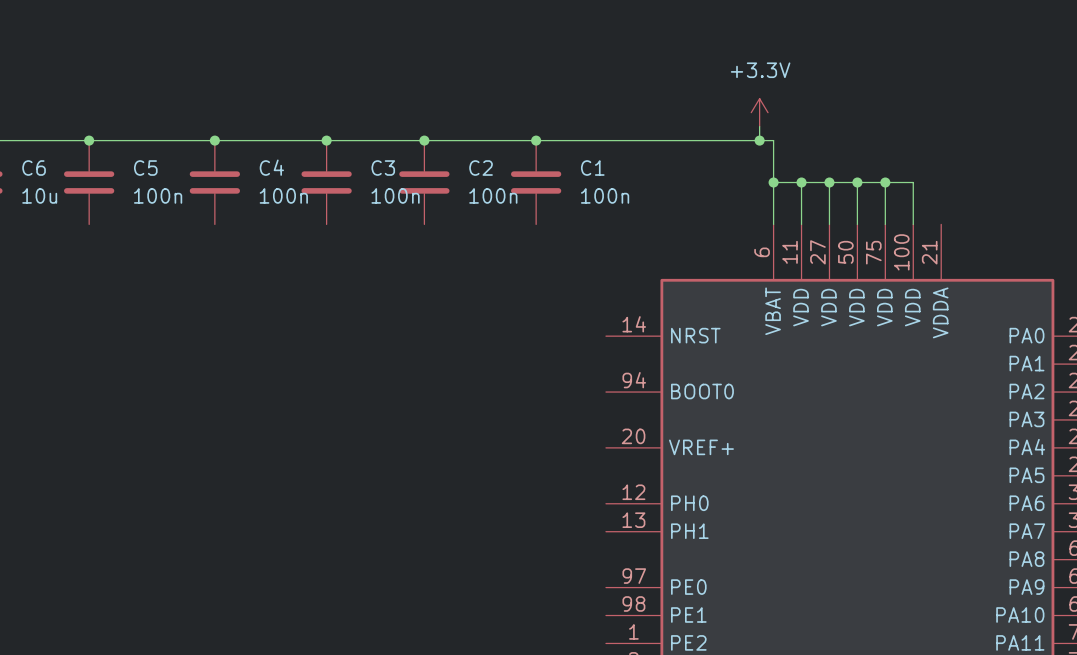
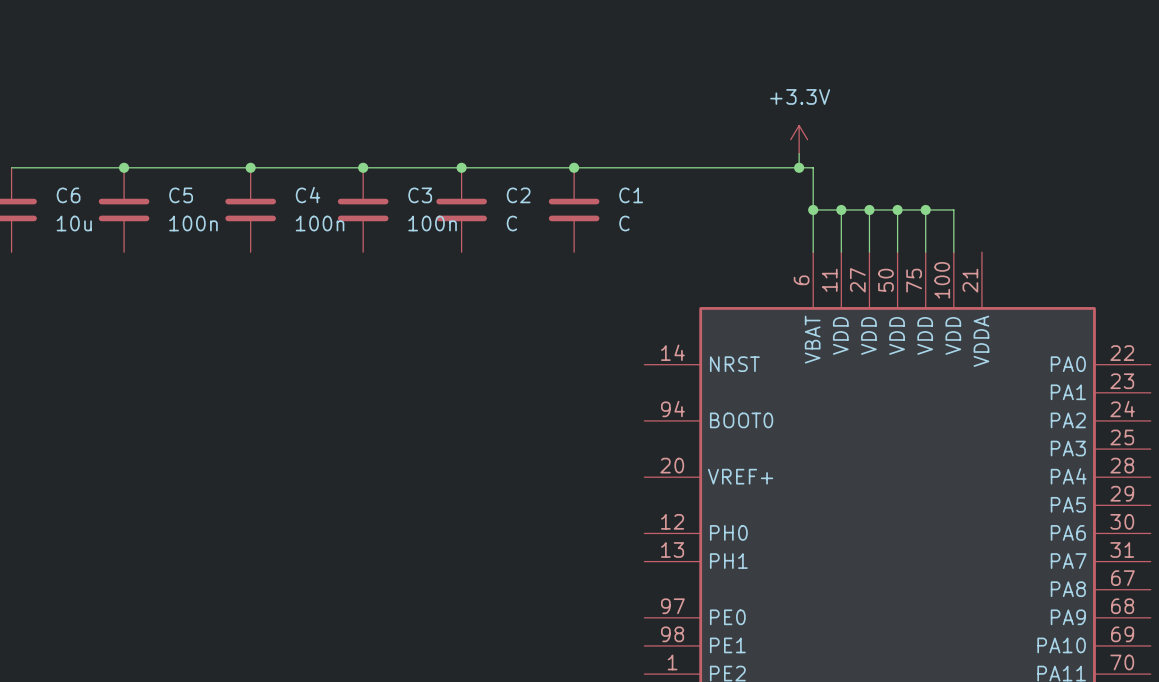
C2 value: 100n (493, 195) -> C (511, 223)
C1 value: 100n (605, 195) -> C (624, 223)

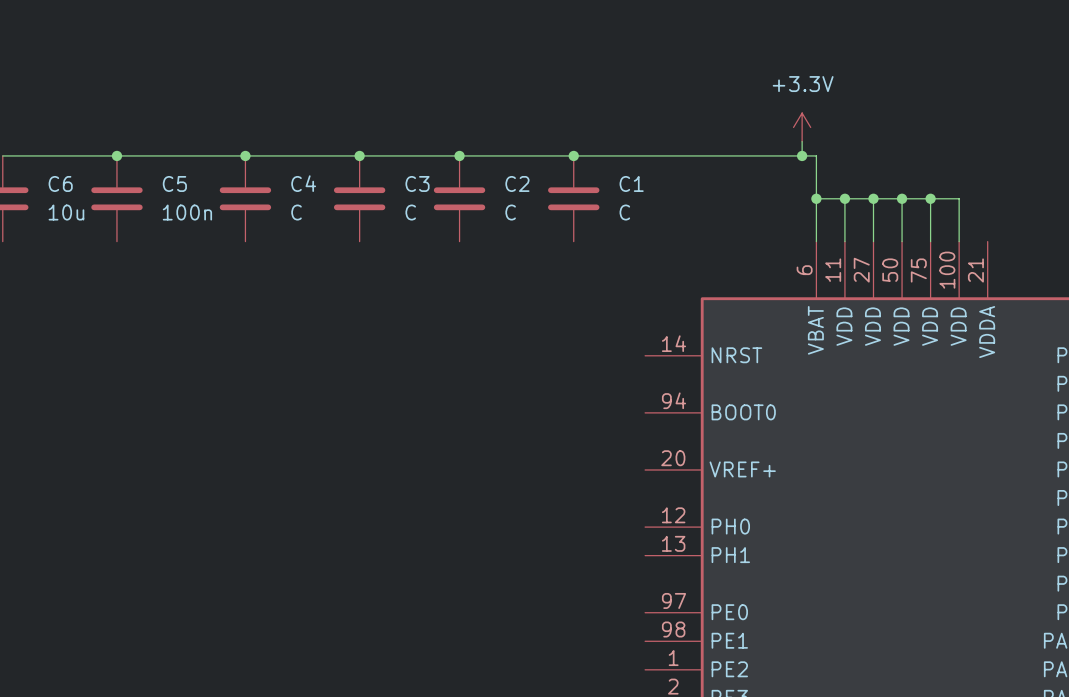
C4 value: 100n (320, 223) -> C (296, 212)
C3 value: 100n (432, 223) -> C (410, 212)

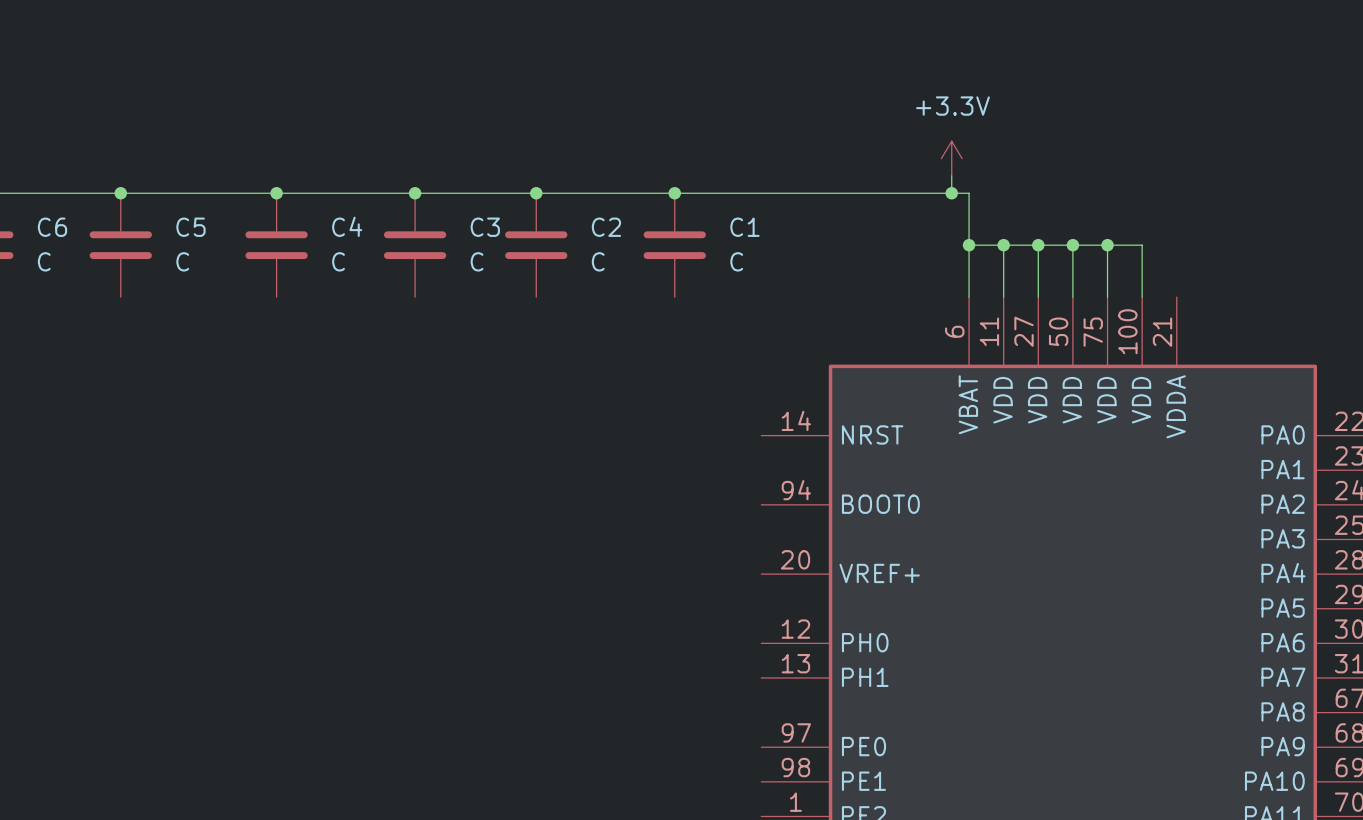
C6 value: 10u (66, 212) -> C (44, 261)
C5 value: 100n (187, 212) -> C (182, 261)

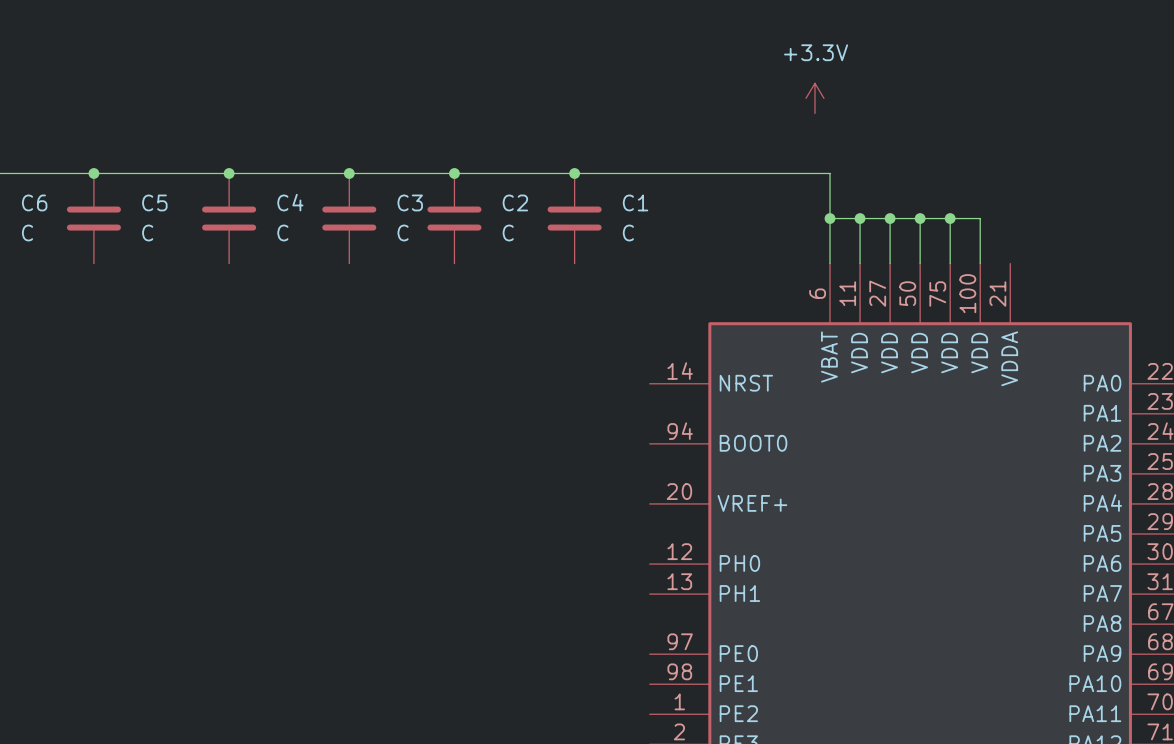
power symbol position: +3.3V (951, 158) -> +3.3V (814, 98)
wire: (951, 175) (951, 193) -> none
junction: (951, 193) -> none

